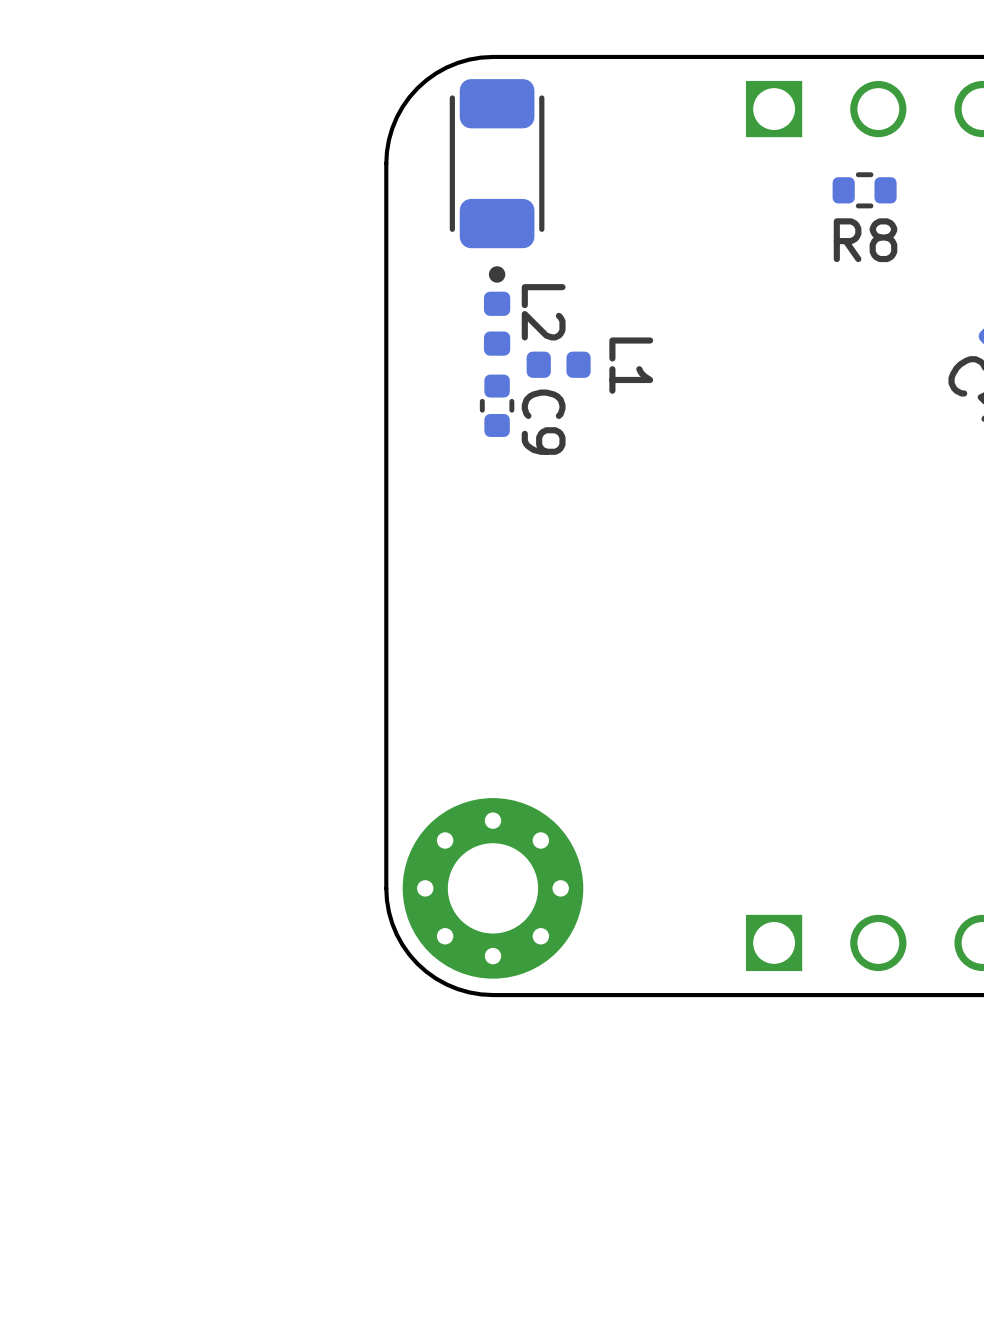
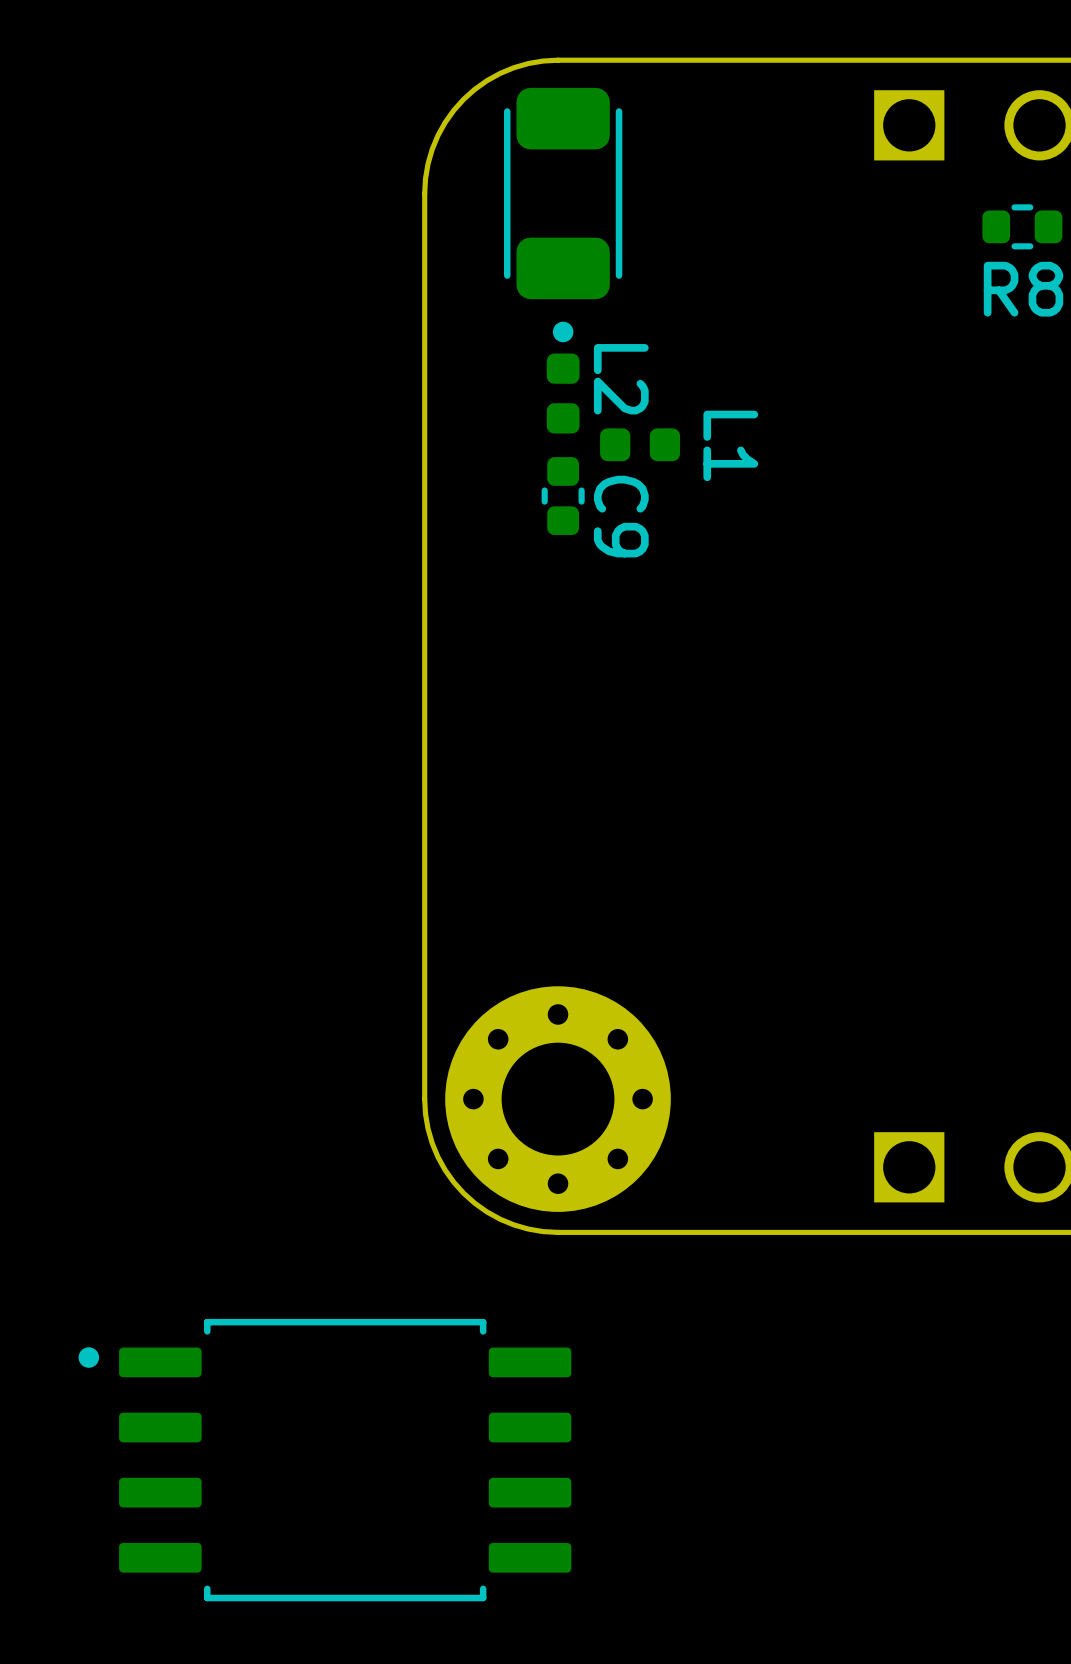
part: none -> (324, 1460)

